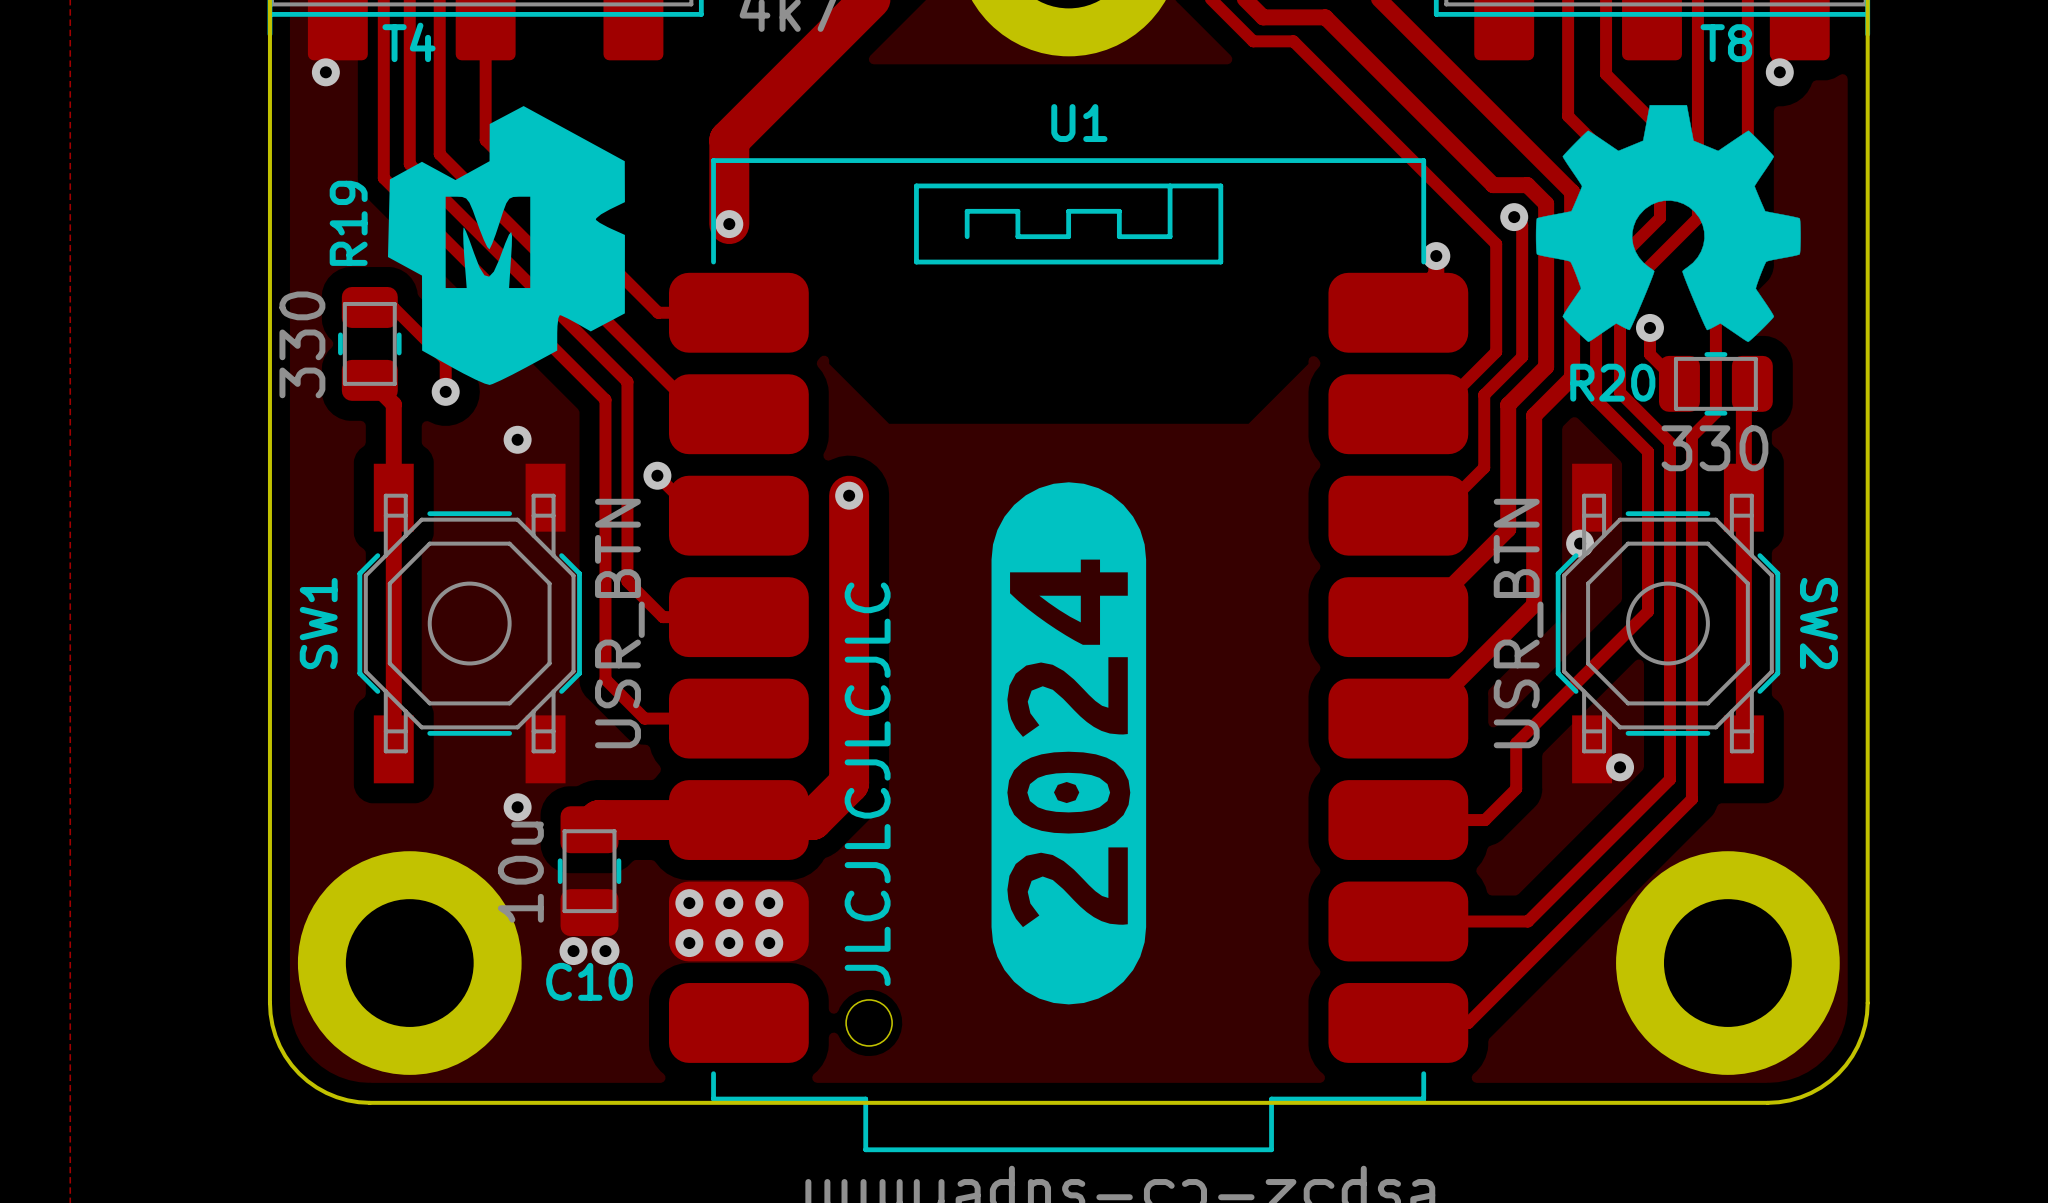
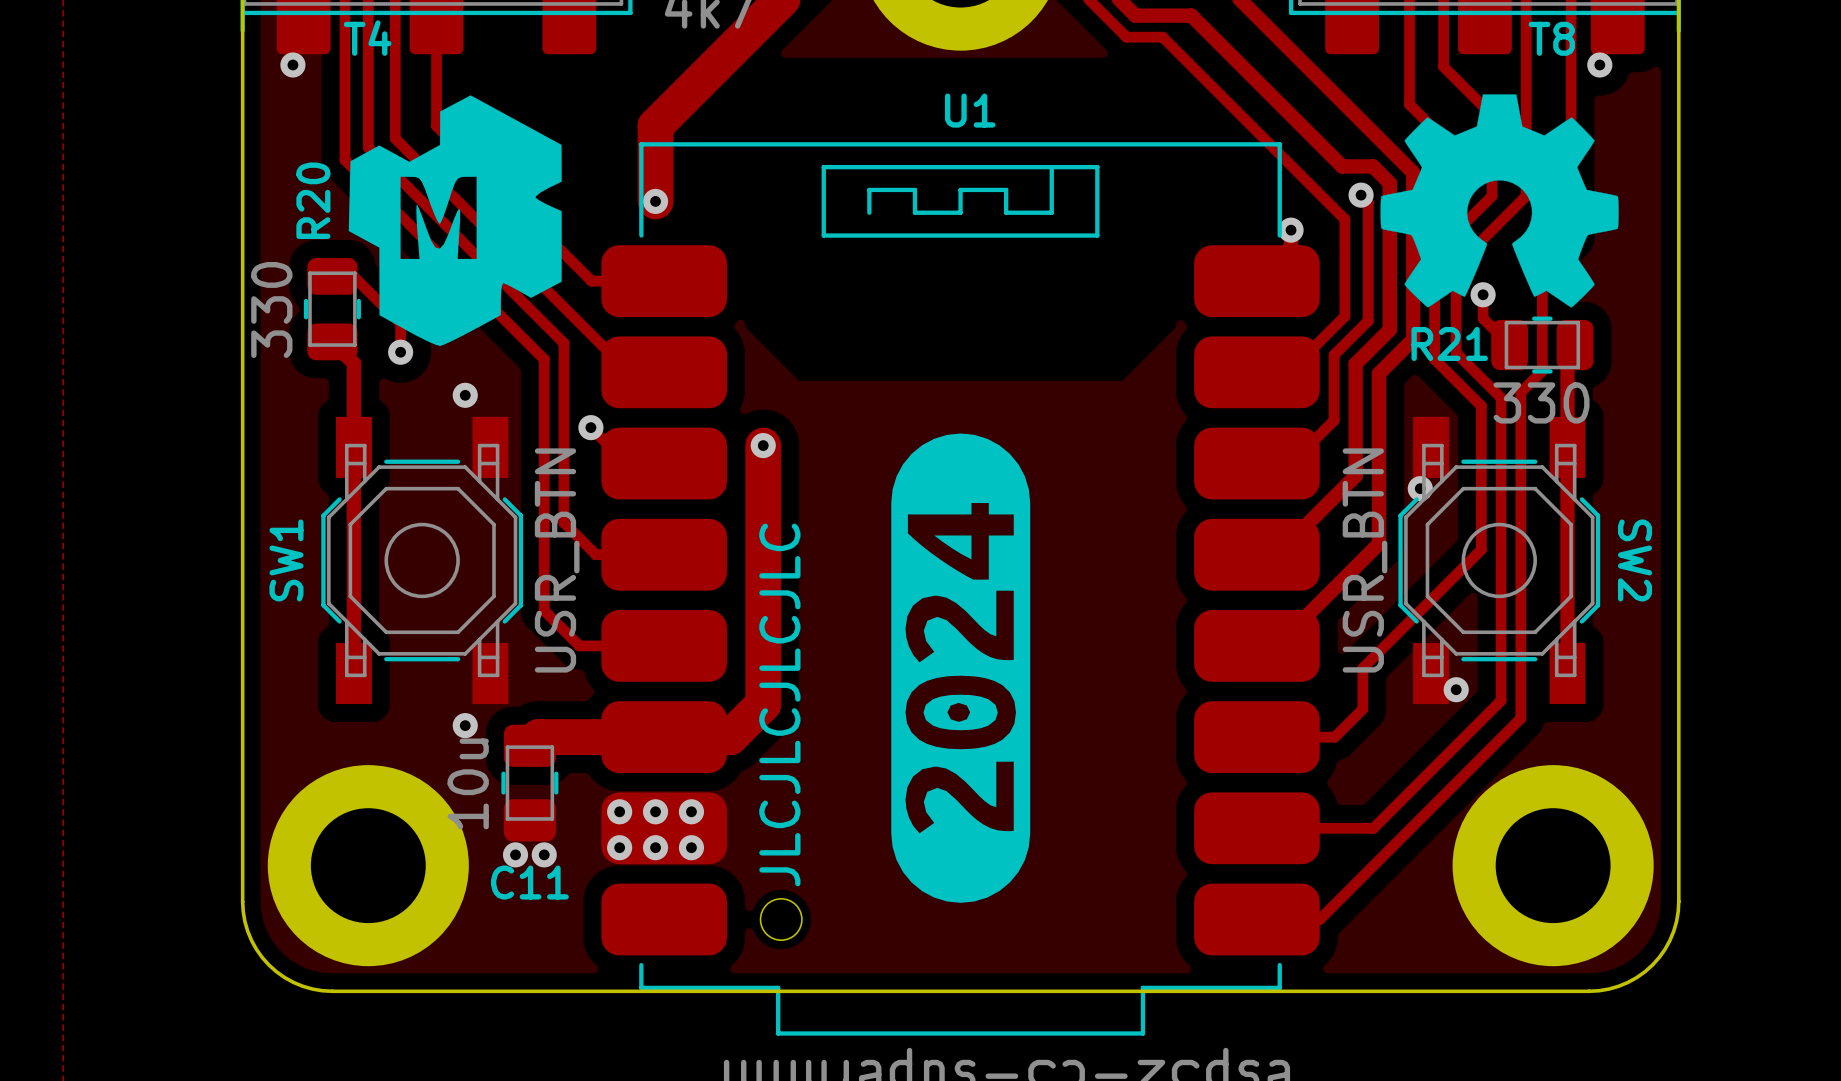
R19 name: R19 (348, 223) -> R20 (313, 200)
R20 name: R20 (1612, 382) -> R21 (1449, 343)
C10 name: C10 (589, 981) -> C11 (529, 882)

